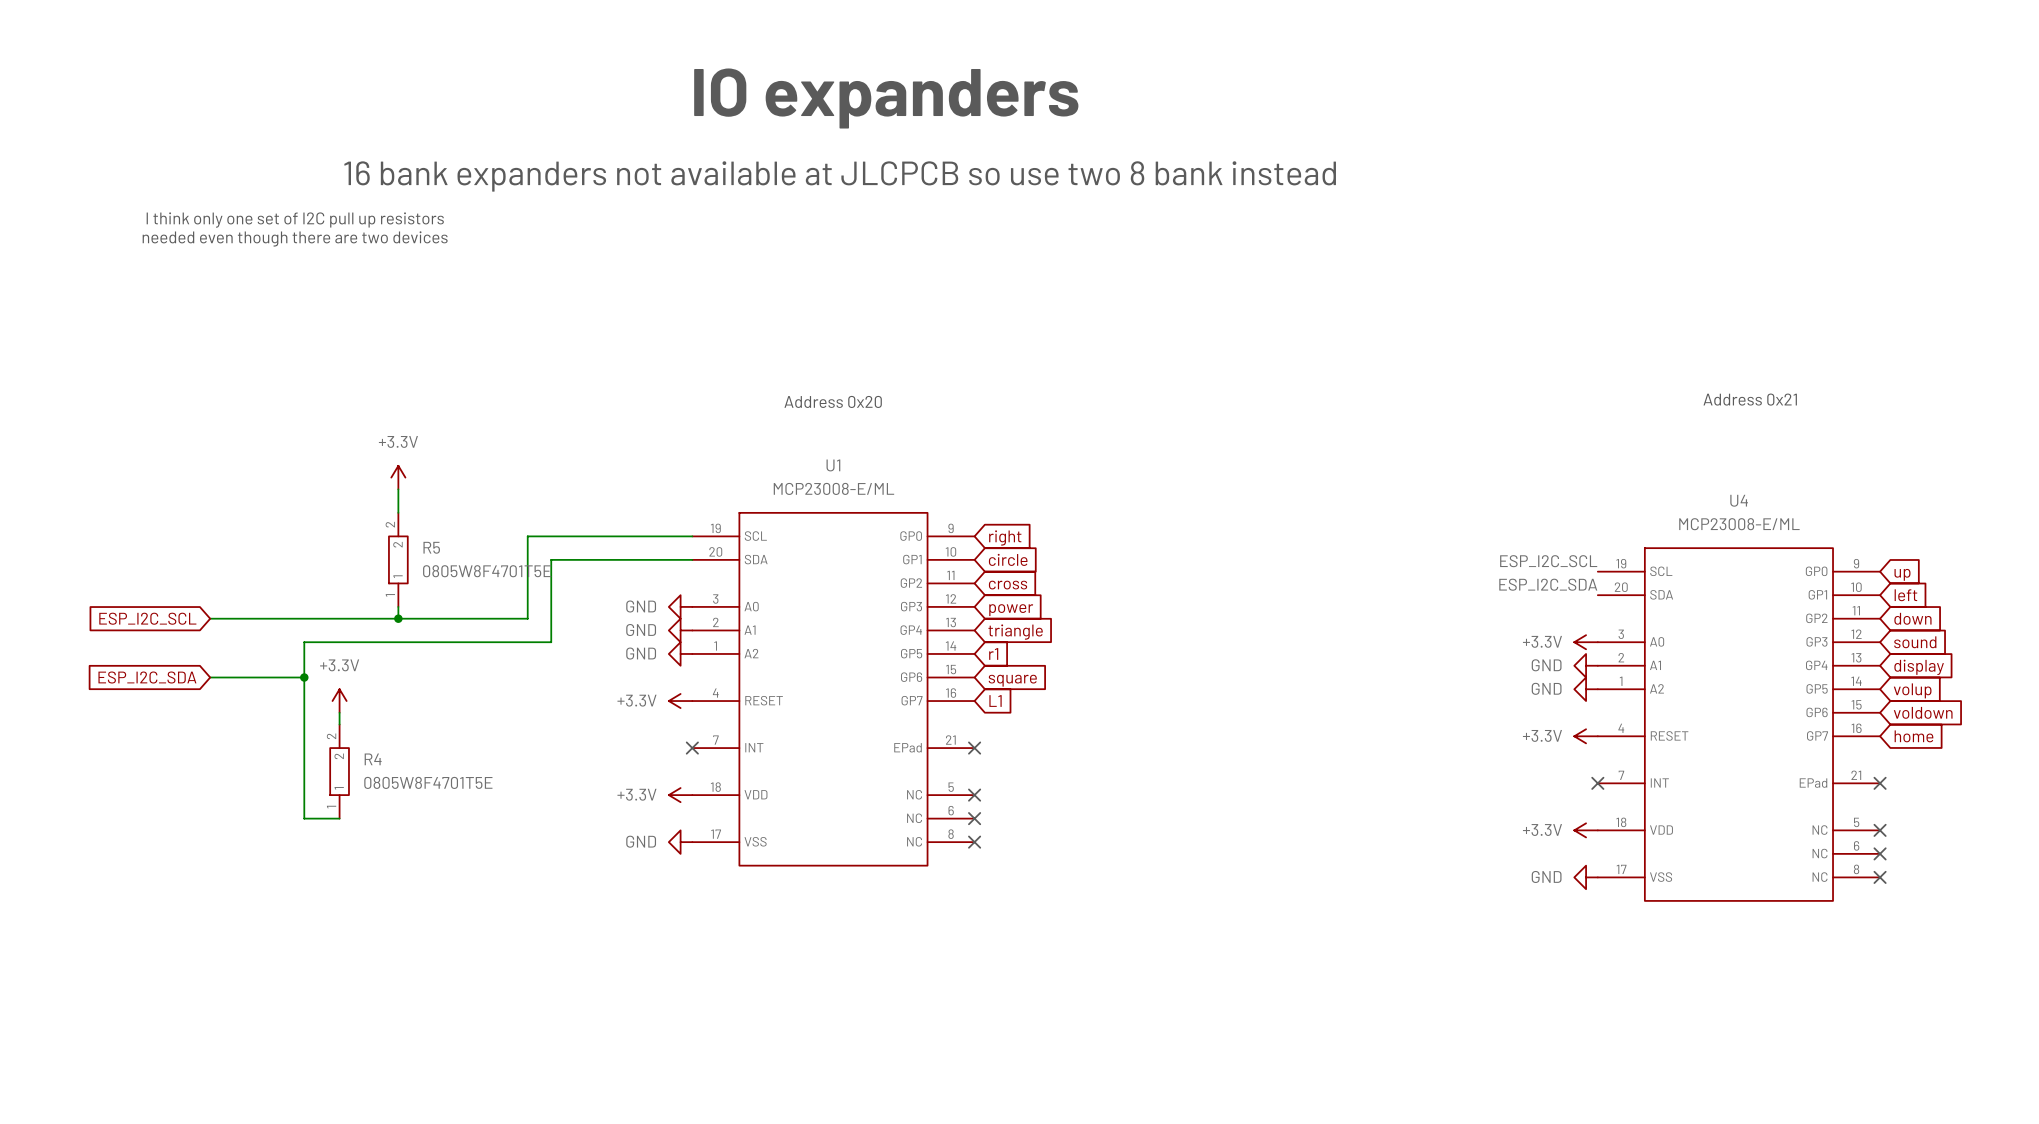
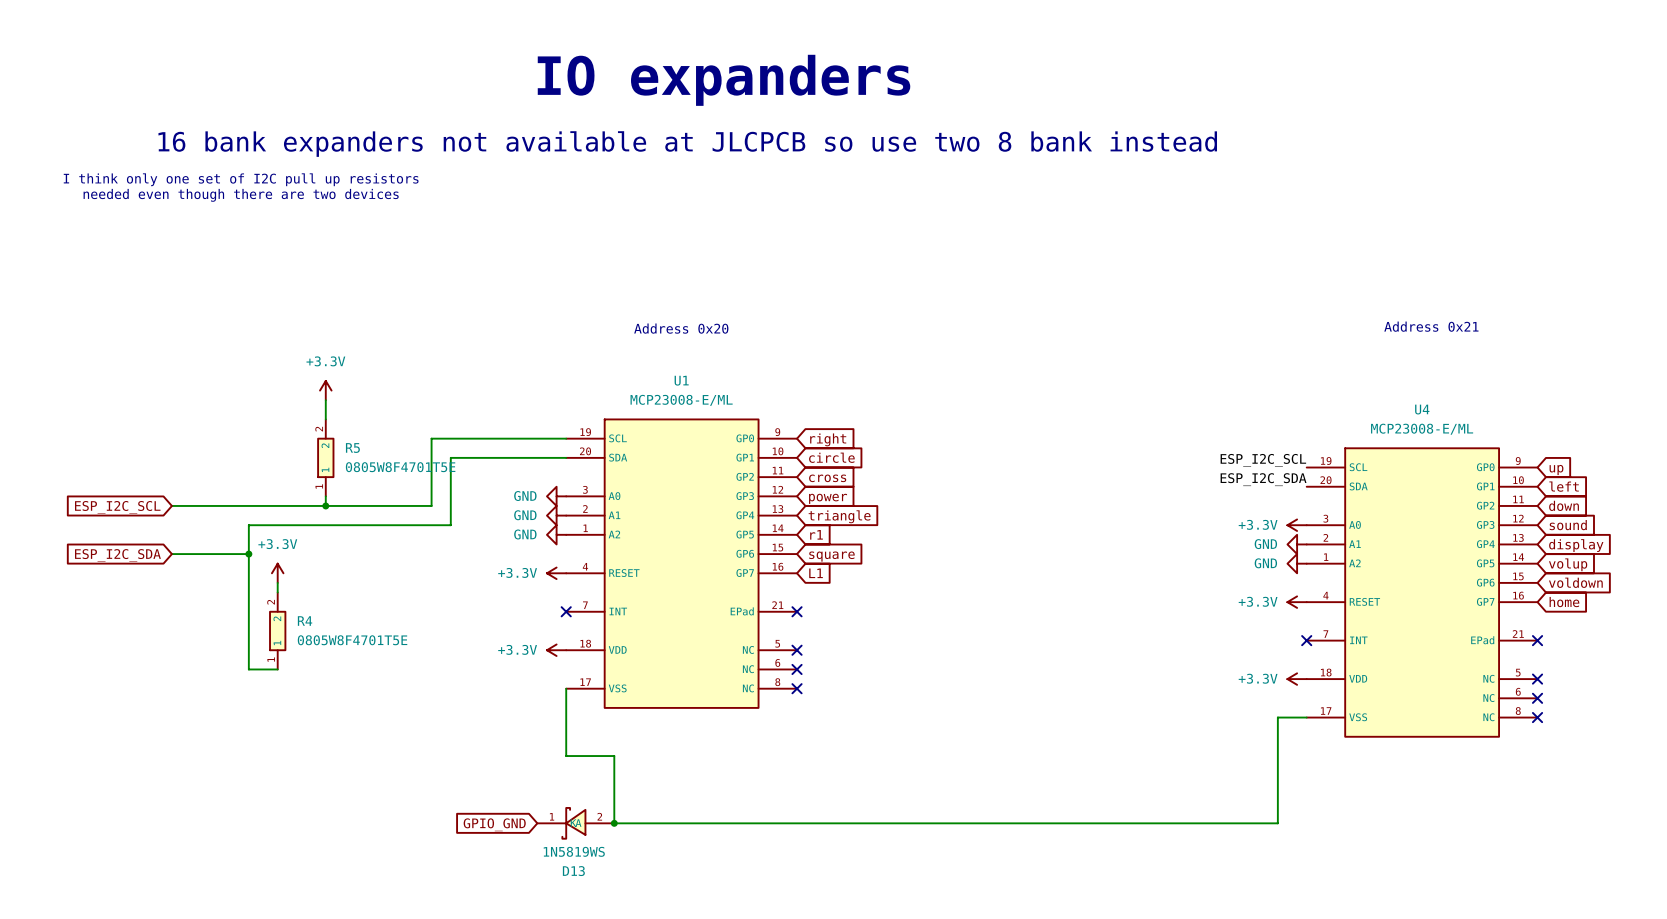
power symbol: GND (680, 842) -> none
wire: none -> (566, 688) (566, 756) (614, 756) (614, 823) (1277, 823) (1277, 717) (1306, 717)
power symbol: GND (1586, 877) -> none
global label: none -> GPIO_GND (494, 824)
D13: none -> 1N5819WS (575, 823)
junction: none -> (614, 823)

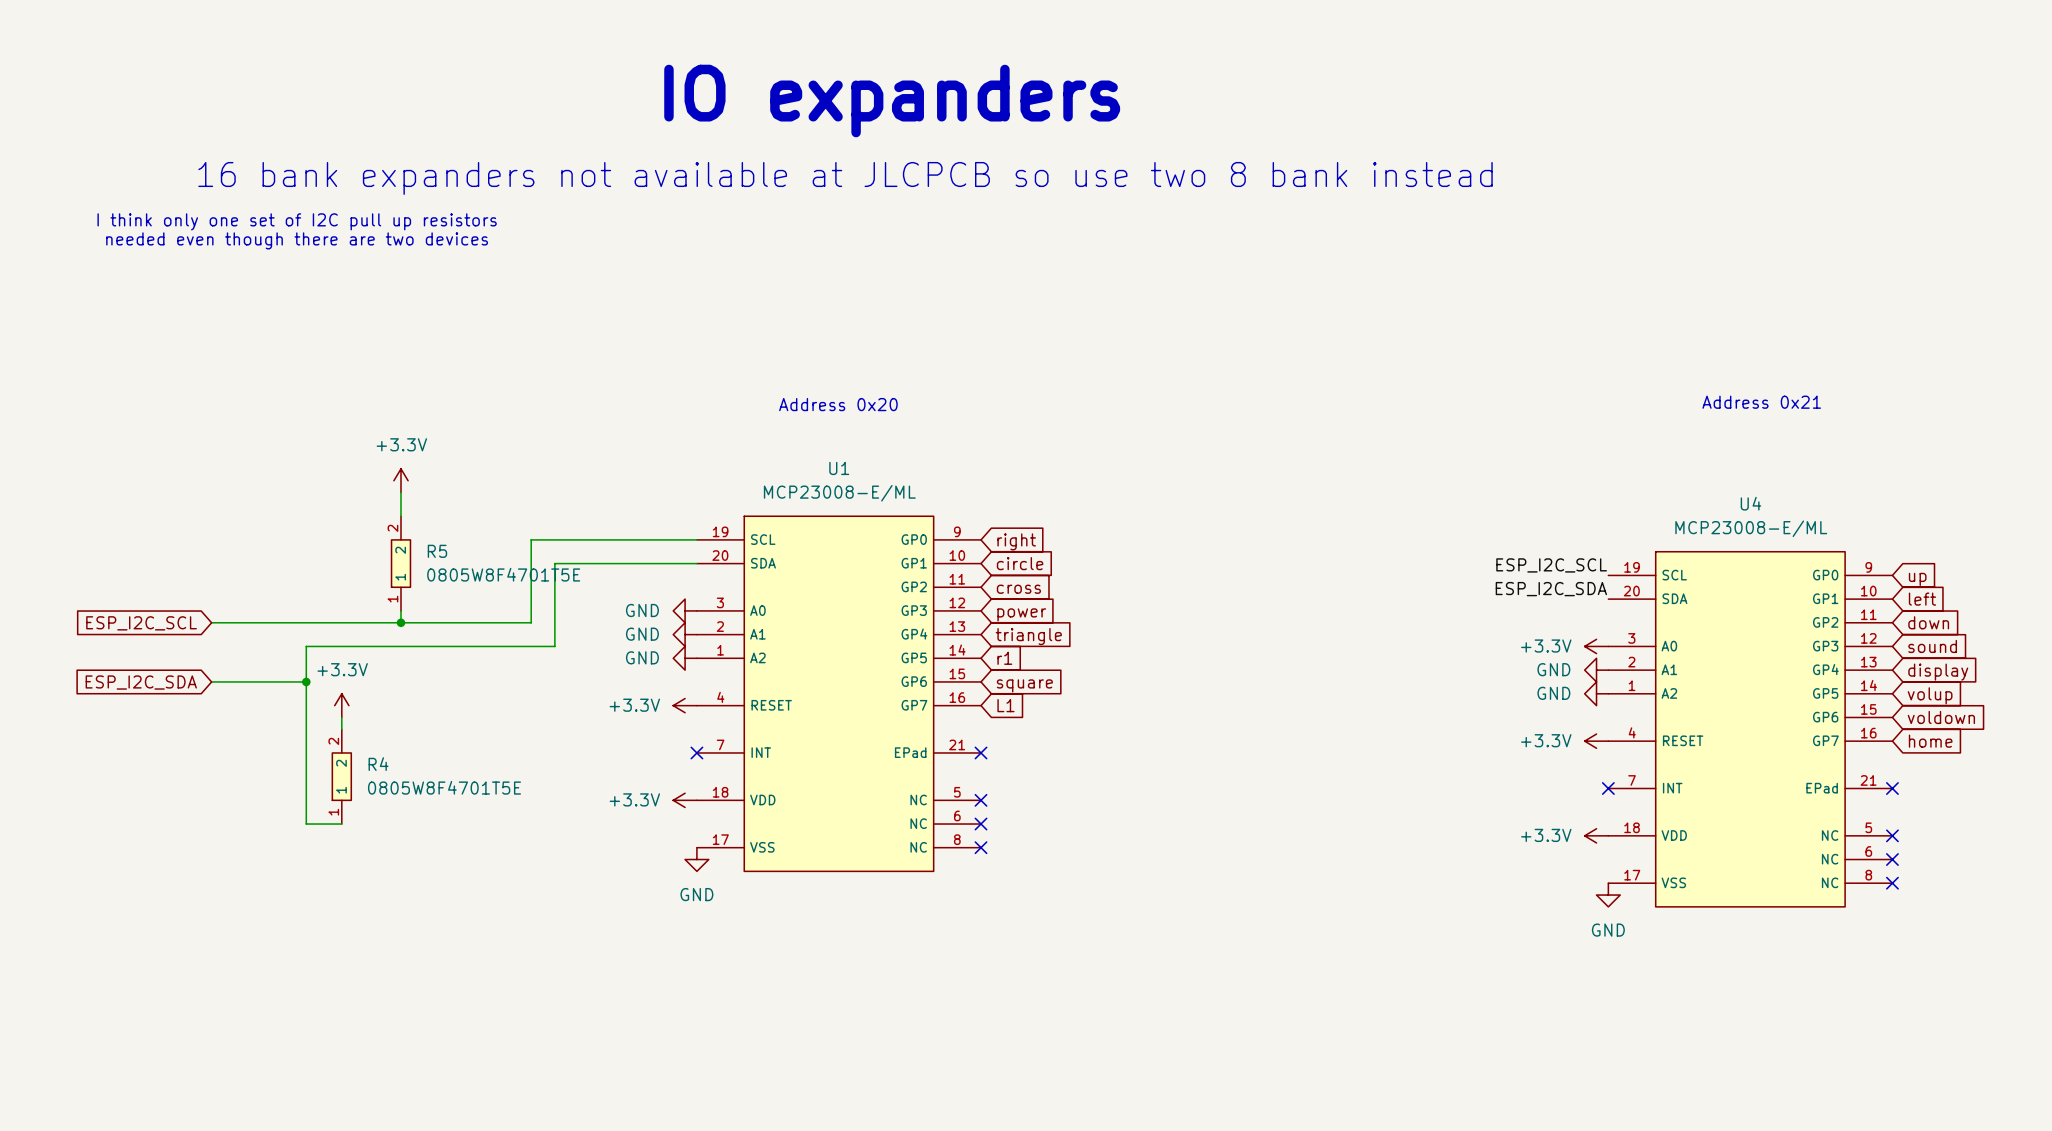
wire: (566, 688) (566, 756) (614, 756) (614, 823) (1277, 823) (1277, 717) (1306, 717) -> none
power symbol: none -> GND (696, 859)
power symbol: none -> GND (1608, 895)
D13: 1N5819WS (575, 823) -> none
junction: (614, 823) -> none
global label: GPIO_GND (494, 824) -> none

